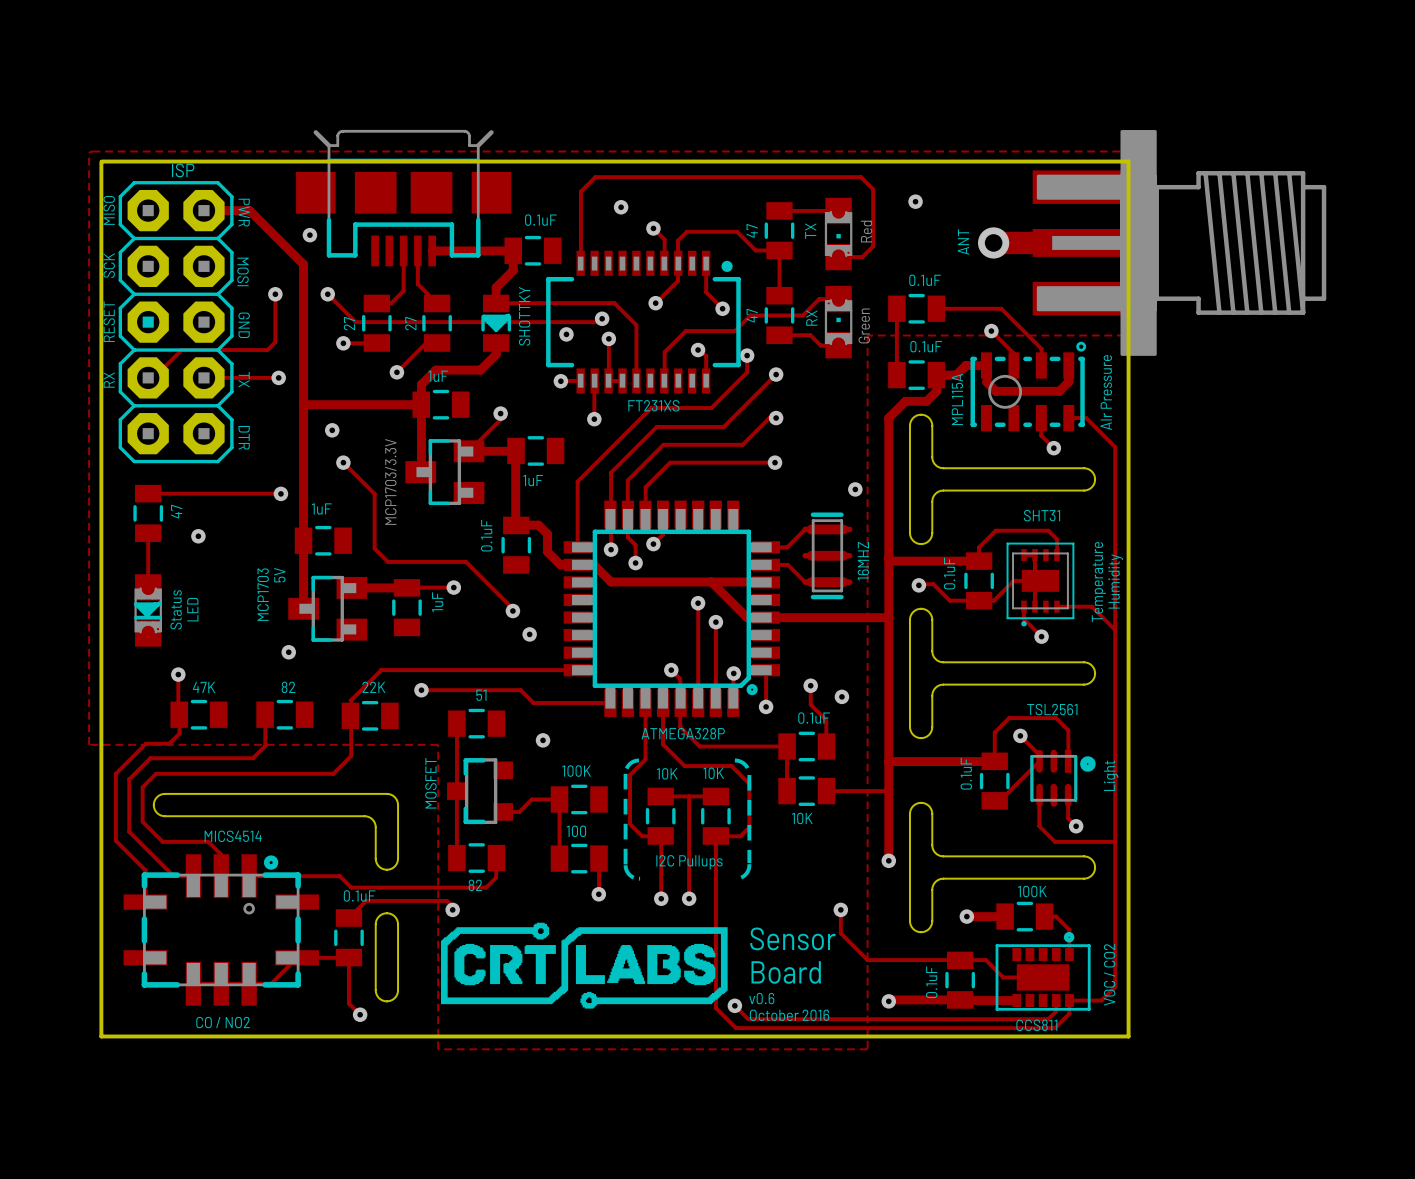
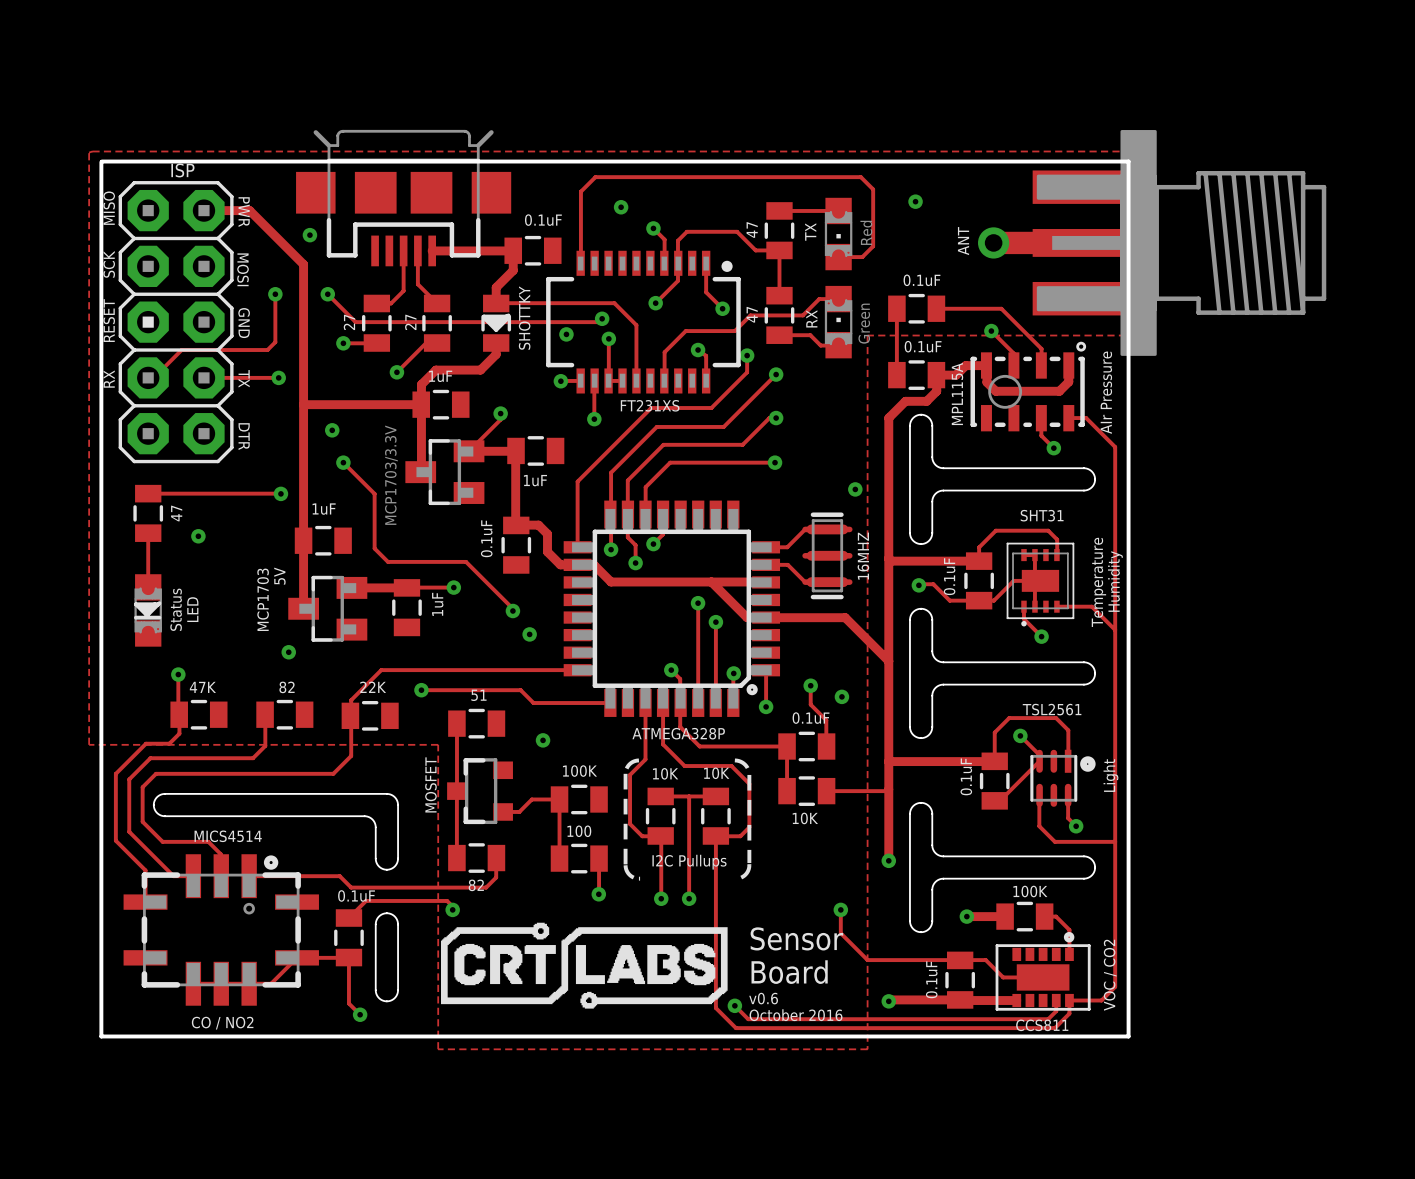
track: (888, 616) (845, 617) -> (888, 661) (845, 617)

